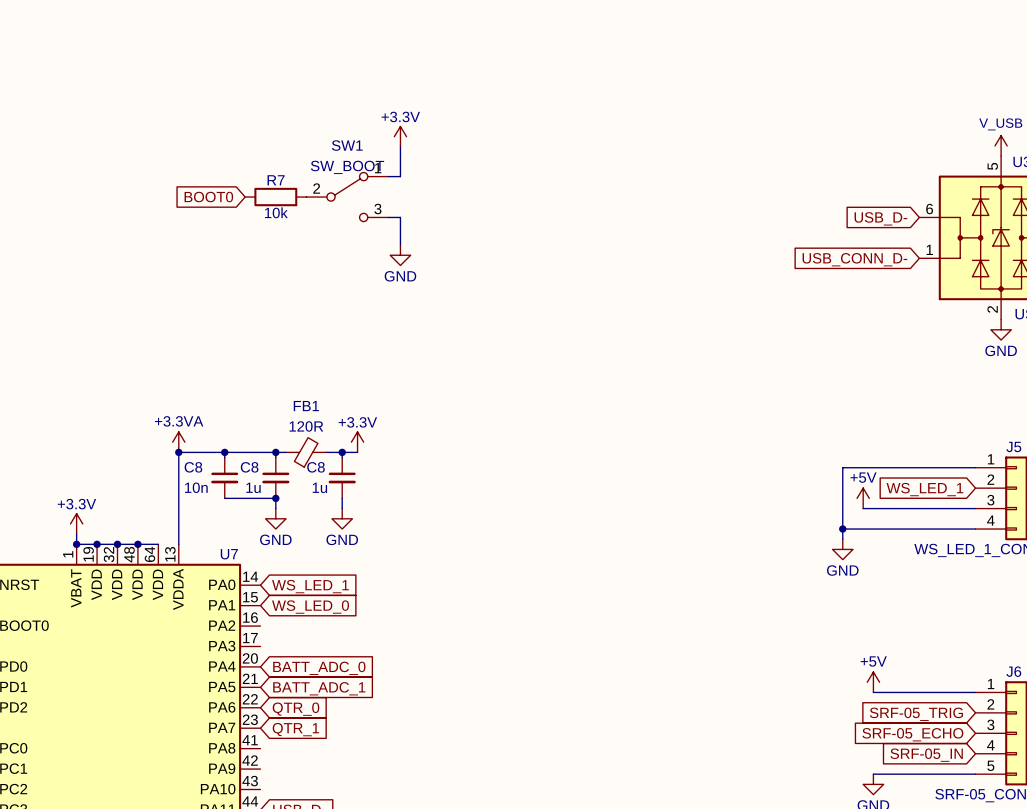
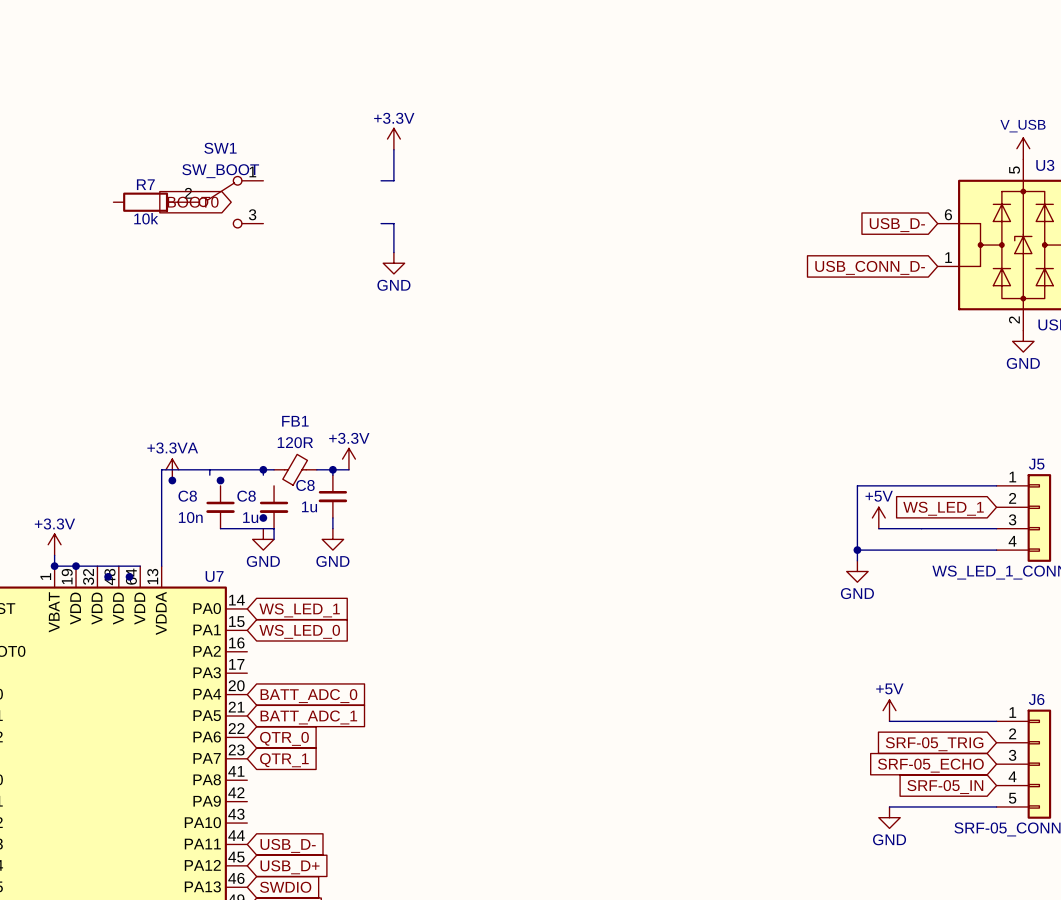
R7 position: (275, 197) -> (145, 202)
SW1 position: (347, 197) -> (220, 202)
power symbol position: +3.3VA (178, 442) -> +3.3VA (172, 469)
junction position: (178, 452) -> (172, 480)
junction position: (224, 452) -> (220, 480)
C8 position: (224, 477) -> (220, 507)
C8 position: (275, 477) -> (274, 507)
wire: (224, 498) (275, 498) (275, 508) -> (220, 528) (274, 528) (274, 539)
junction: (117, 544) -> none
junction: (137, 544) -> none
junction: none -> (108, 576)
junction: none -> (129, 576)

